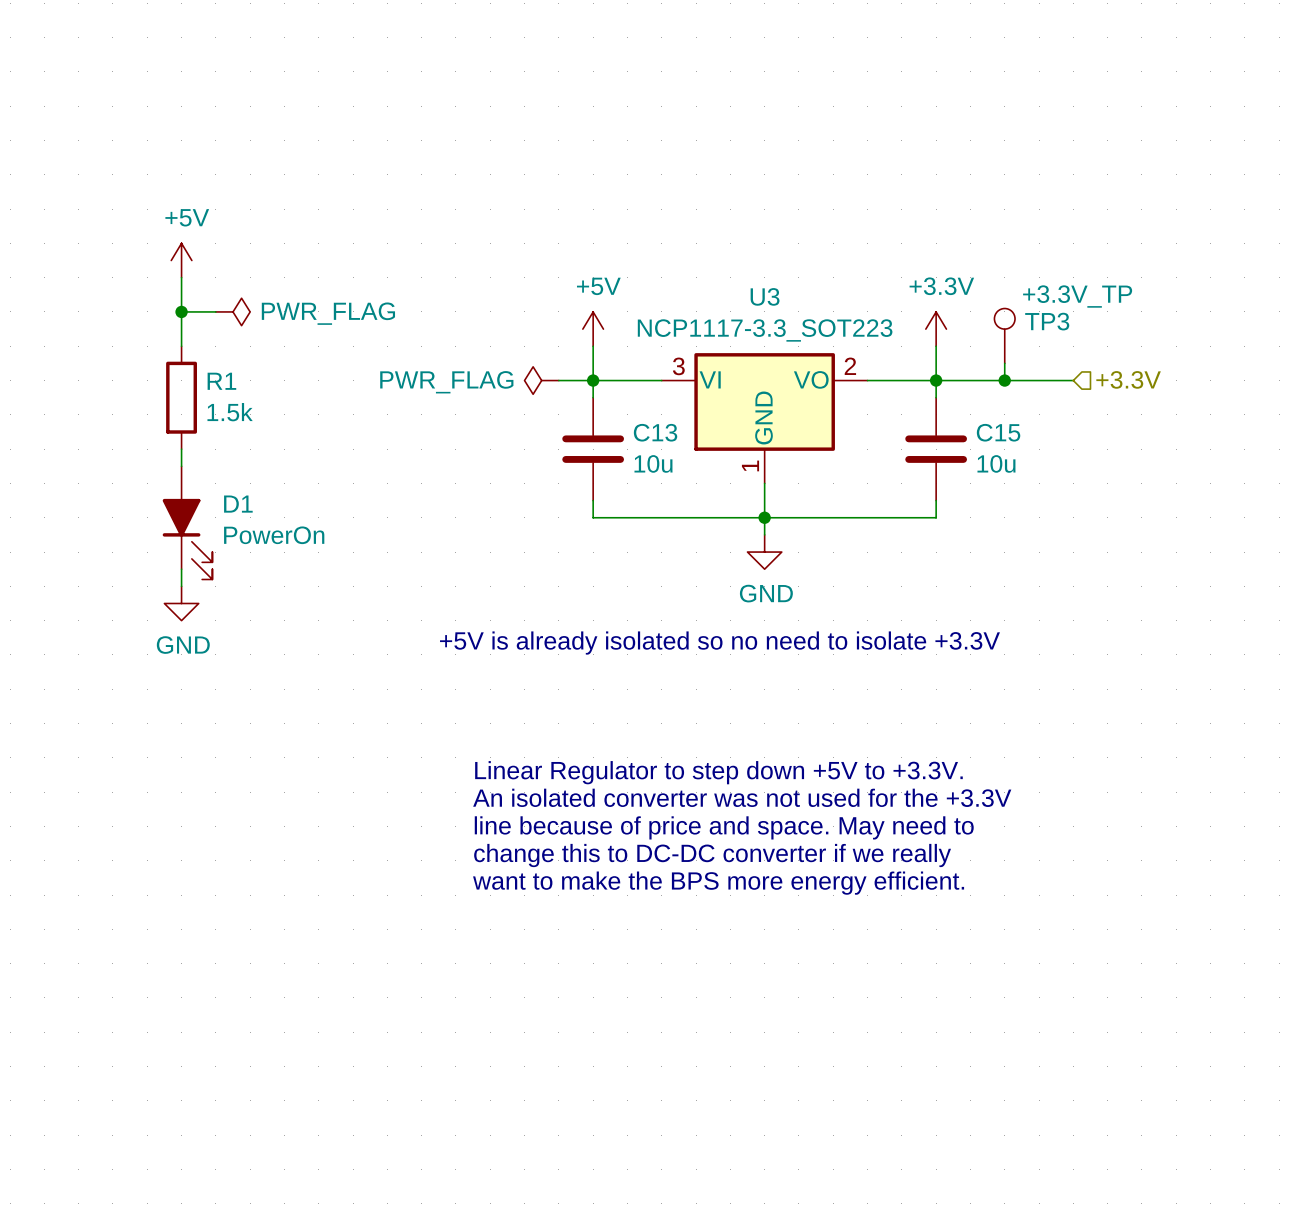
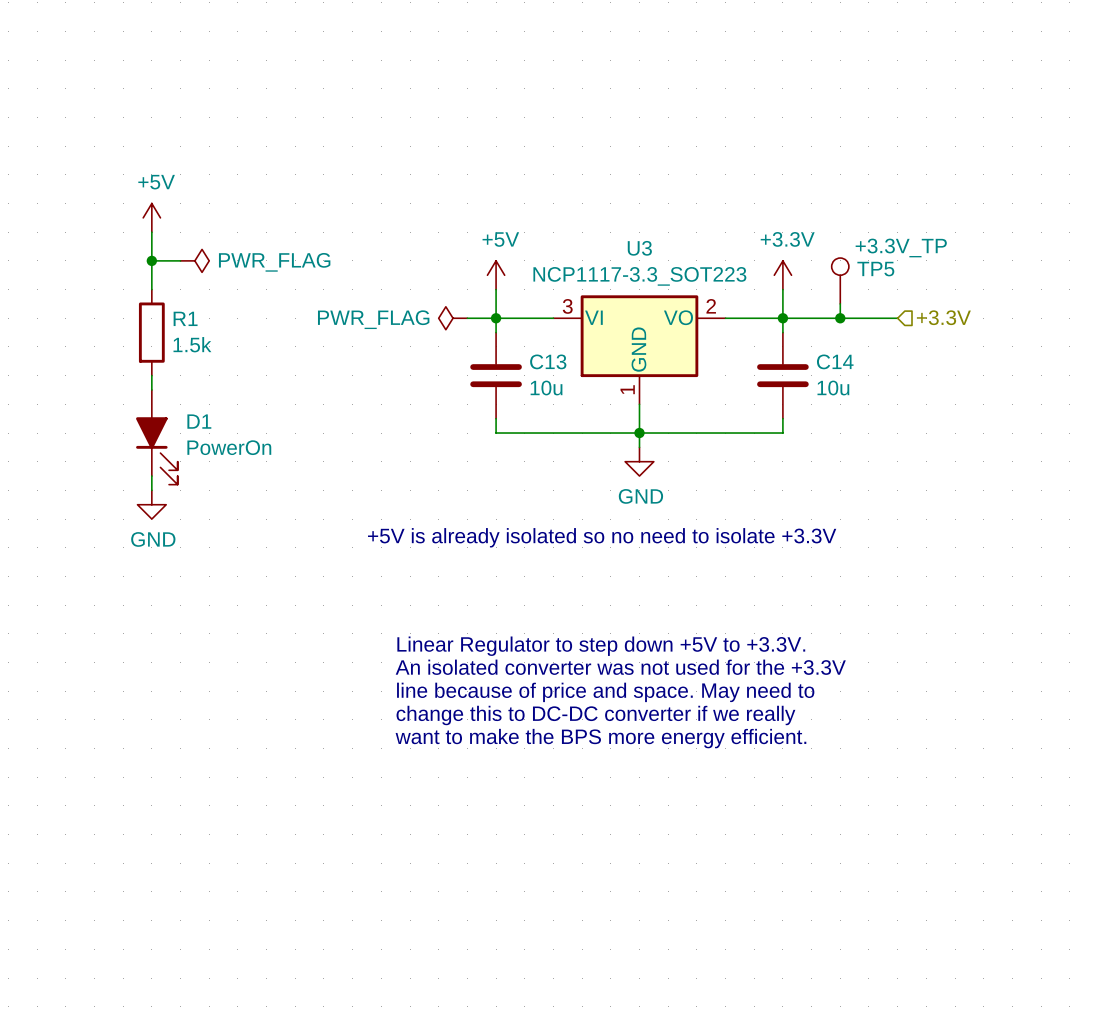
TP3 name: TP3 (1047, 321) -> TP5 (875, 269)
C15 name: C15 (998, 432) -> C14 (835, 361)

